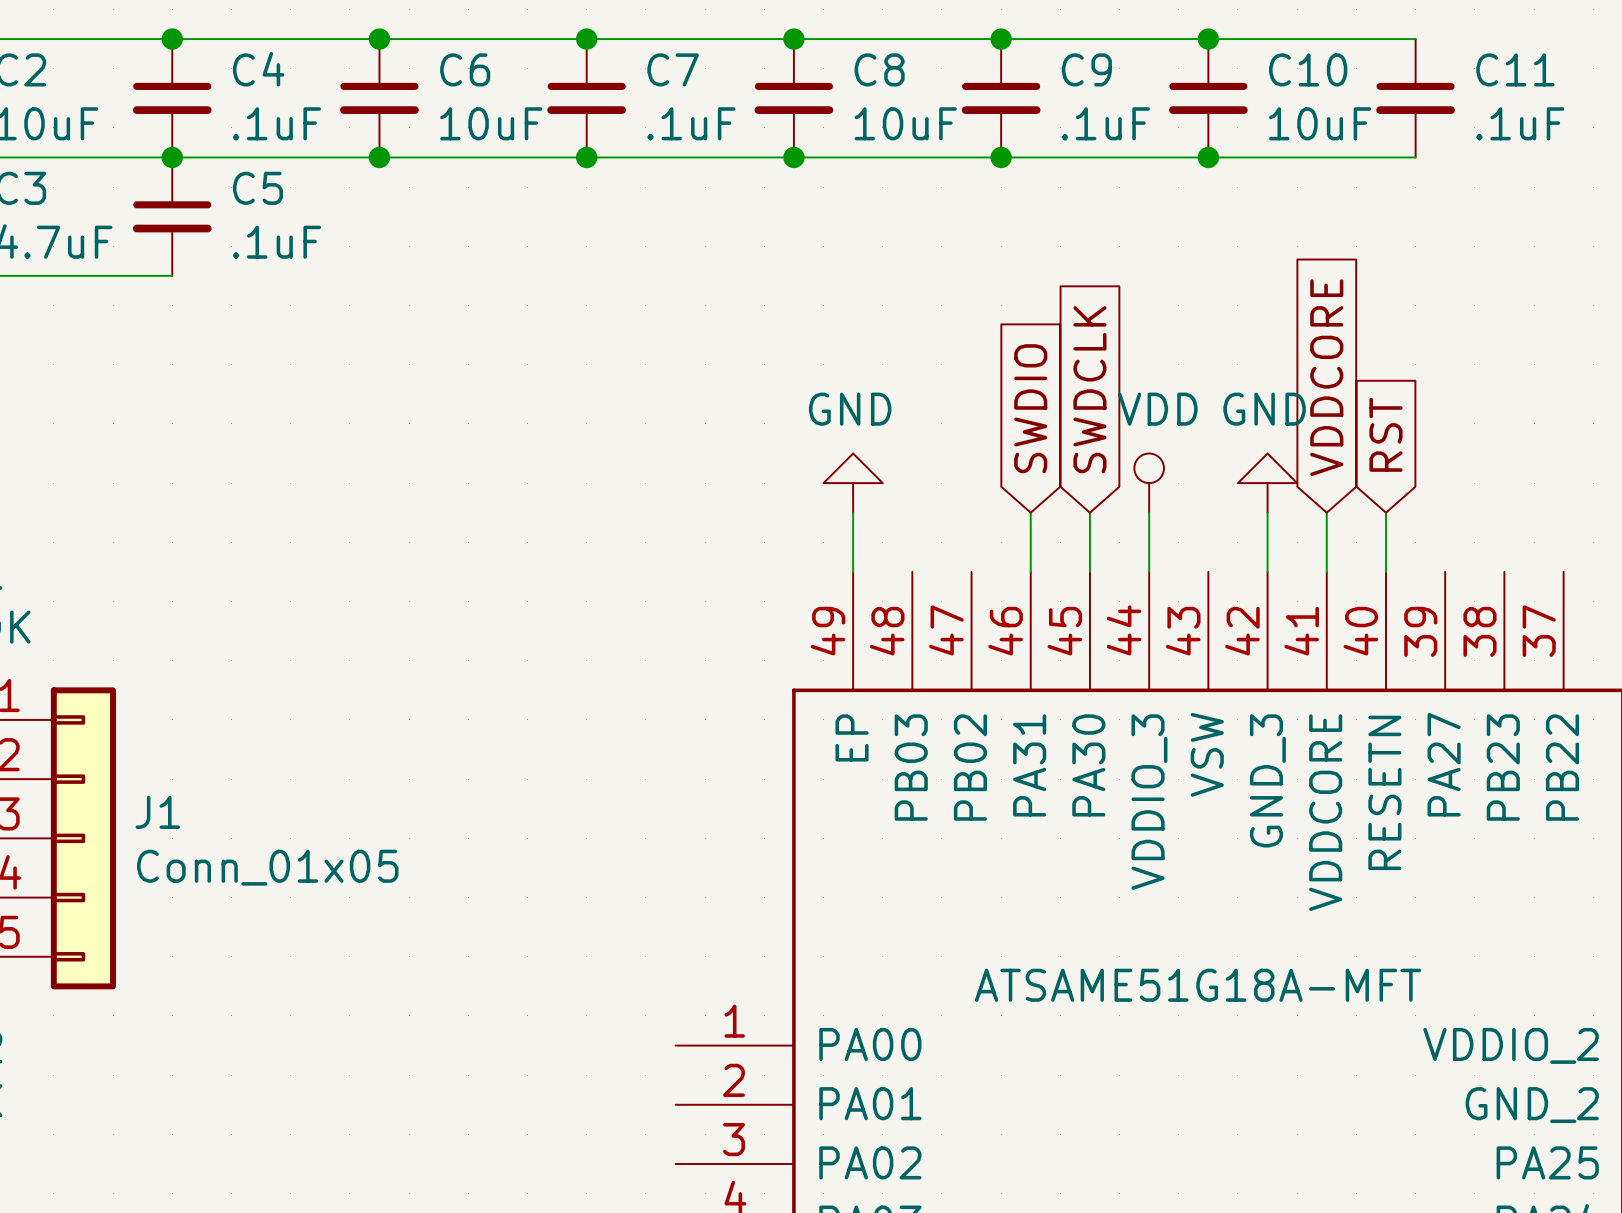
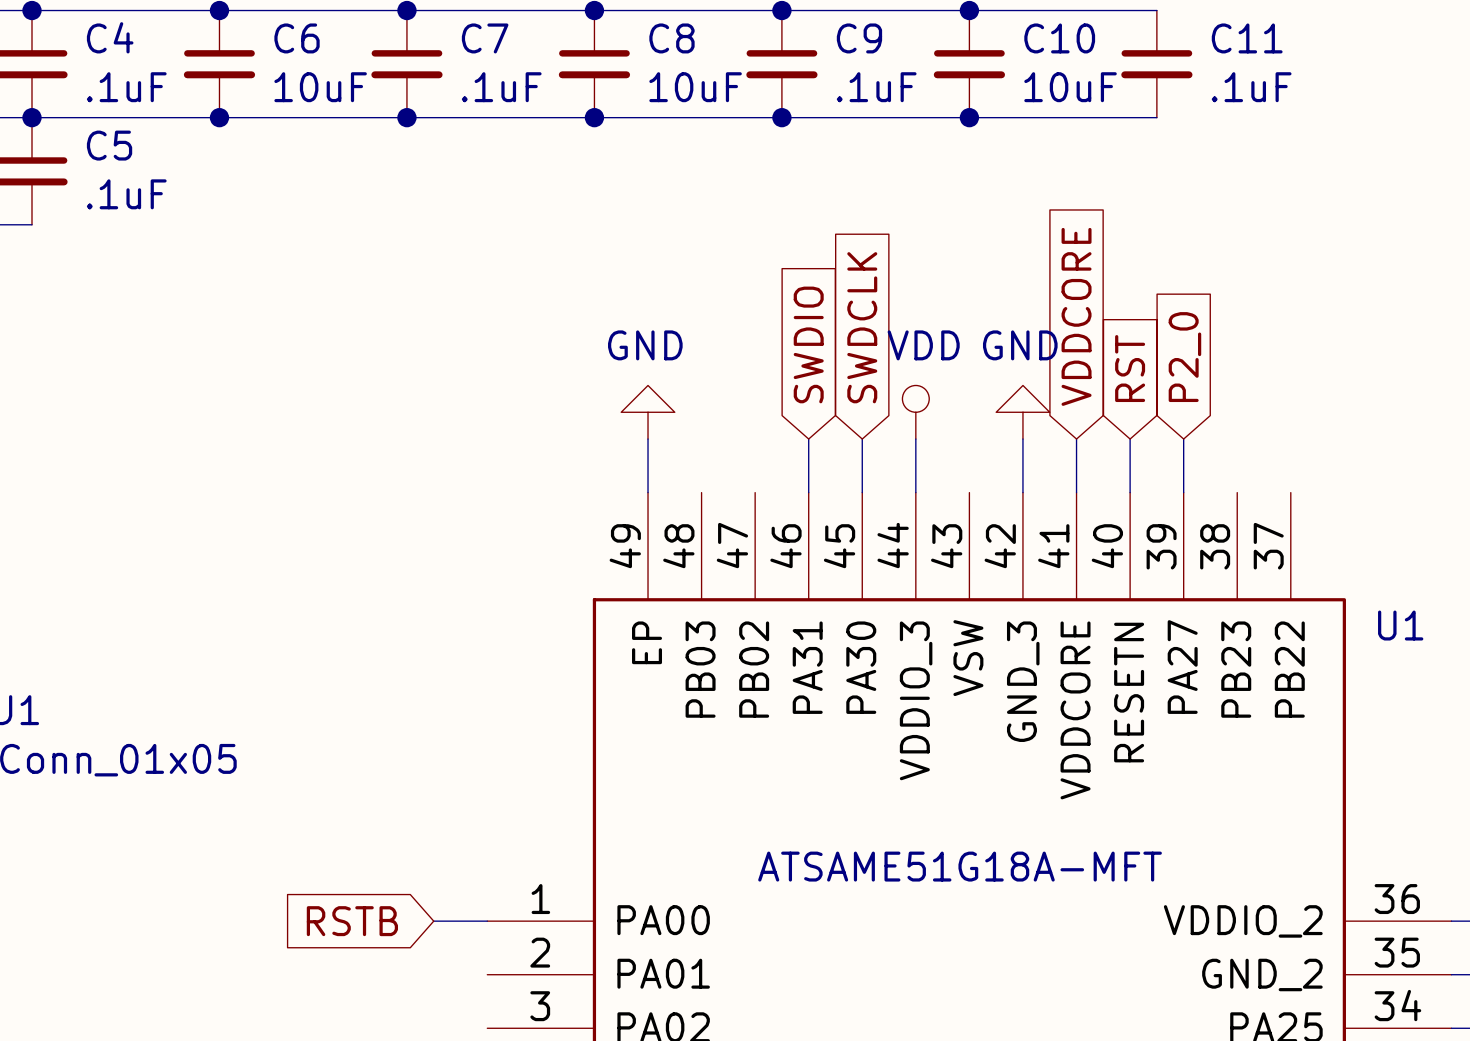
global label: none -> P2_0 (1184, 357)
wire: none -> (1183, 439) (1183, 492)
global label: none -> RSTB (352, 921)
wire: none -> (433, 921) (487, 921)

